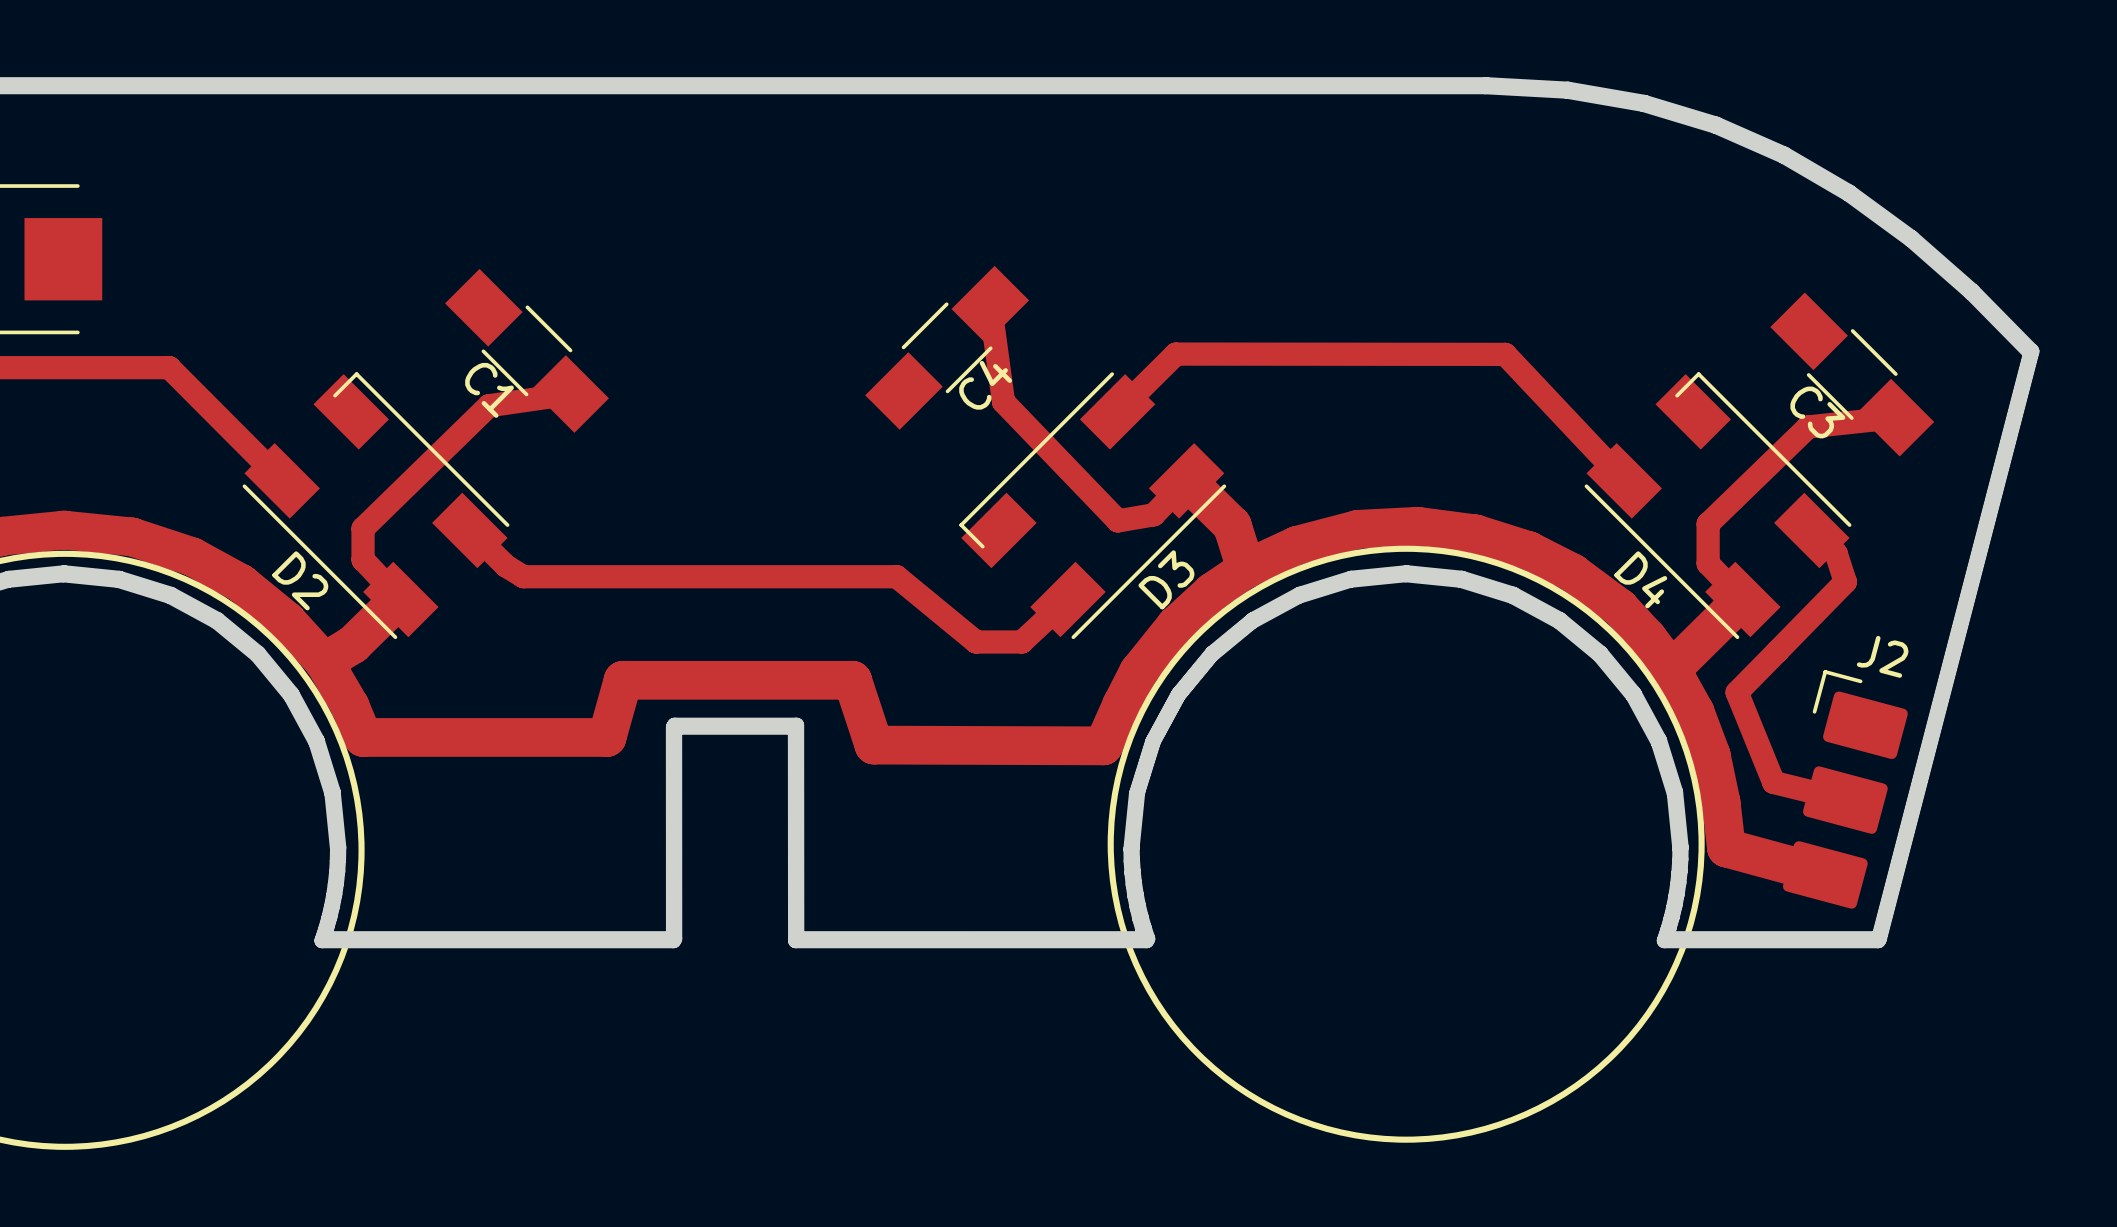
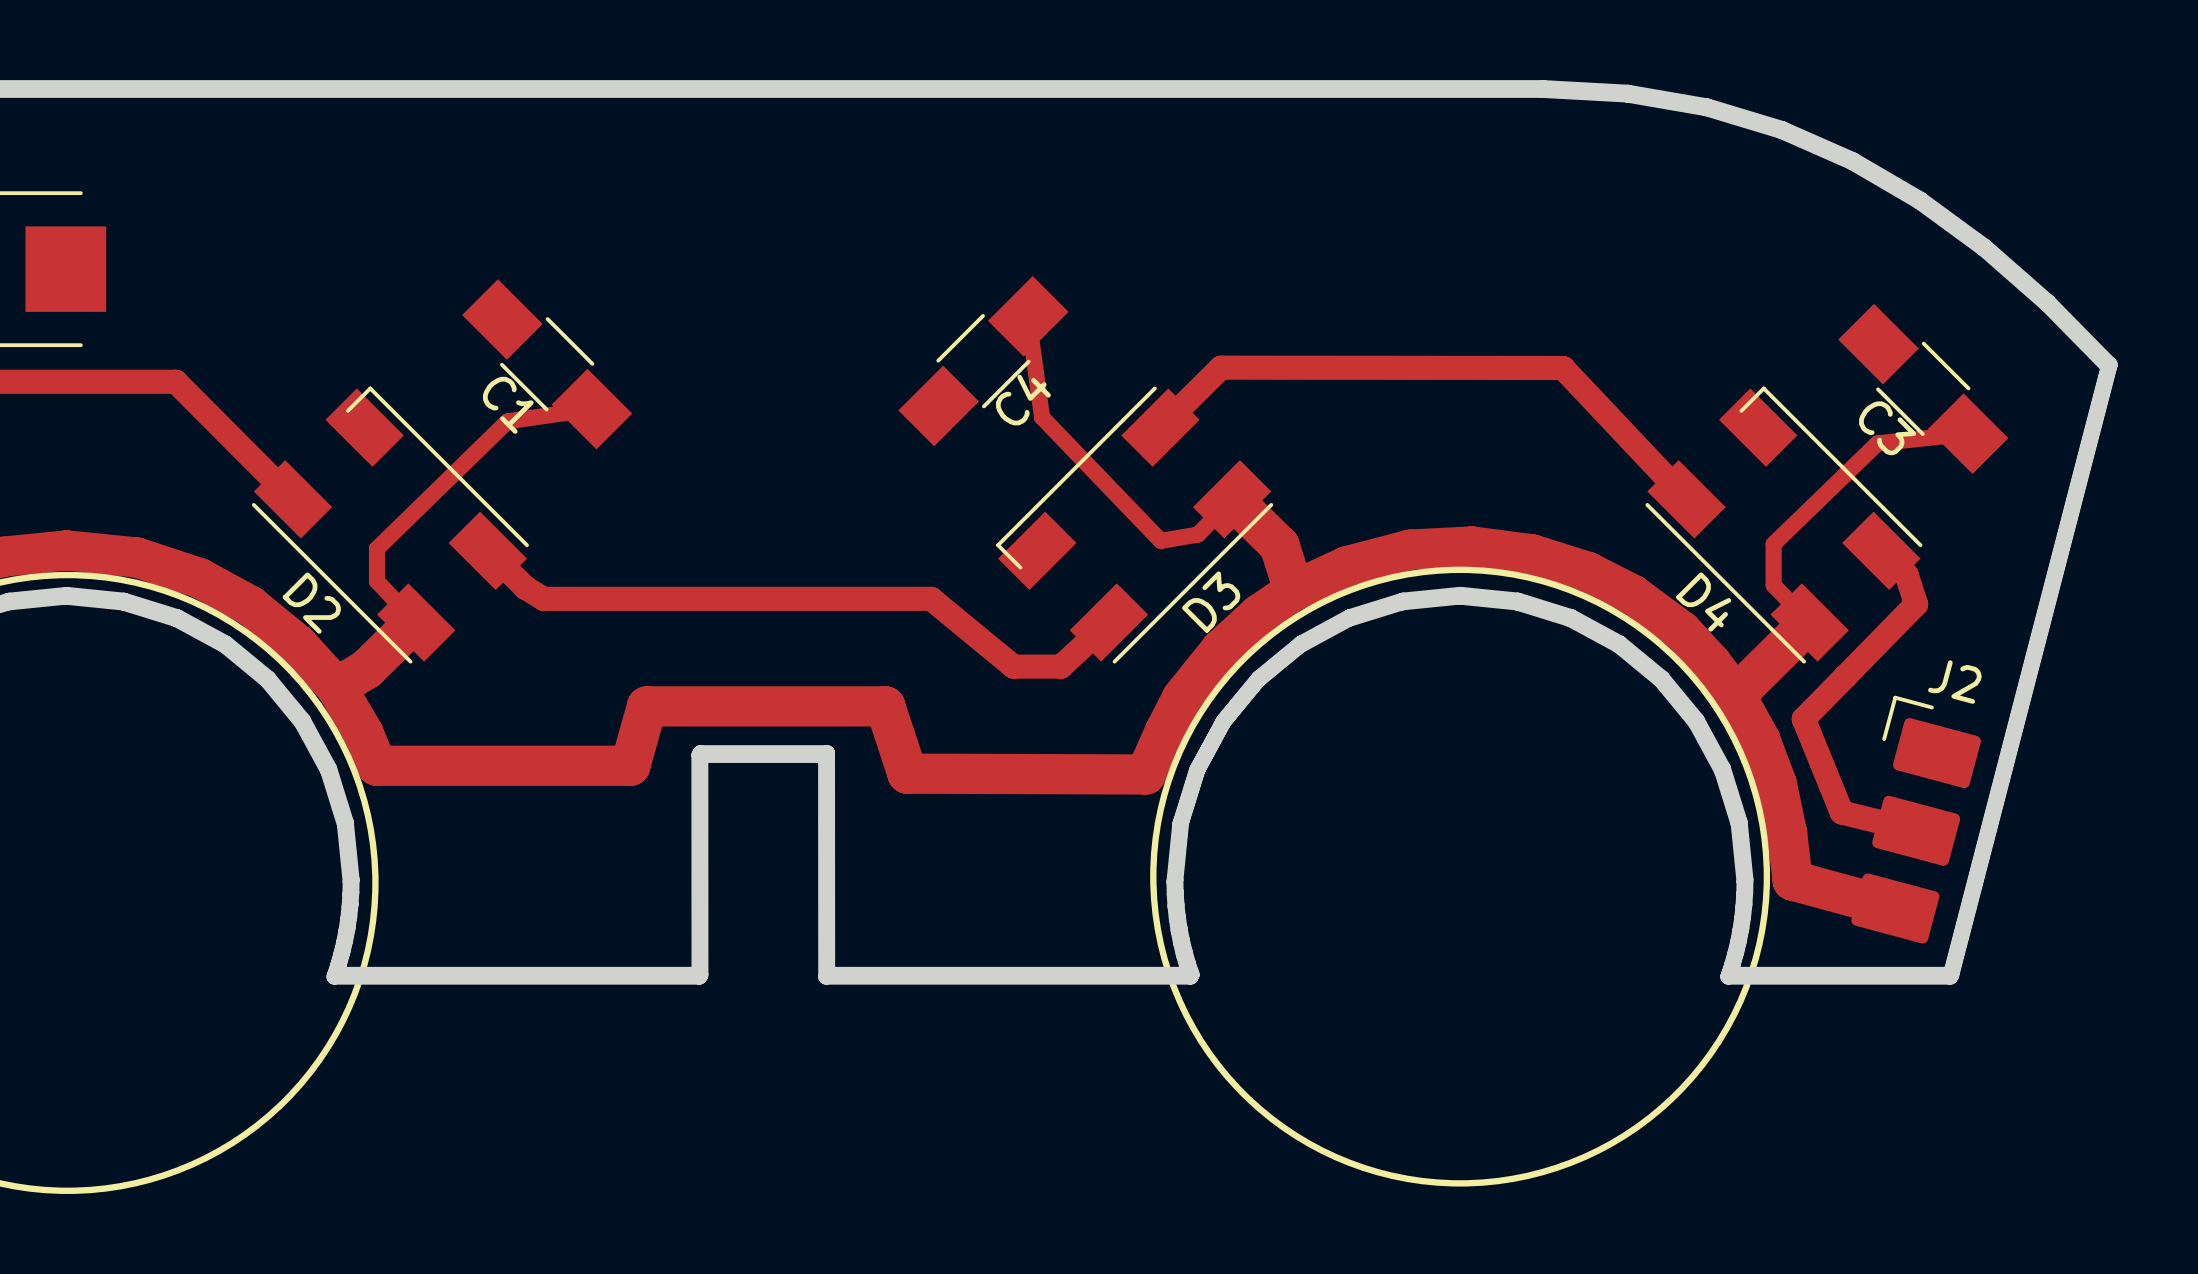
track width: thick (990, 304) (1003, 401) (1117, 520) (1153, 514) (1181, 486) -> thin (1028, 316) (1042, 417) (1160, 540) (1198, 534) (1226, 504)
track width: thick (570, 394) (488, 405) (363, 528) (363, 559) (395, 594) -> thin (591, 409) (507, 421) (376, 548) (376, 581) (410, 616)
track width: thick (1895, 417) (1808, 426) (1708, 523) (1708, 563) (1737, 594) -> thin (1968, 433) (1877, 443) (1773, 544) (1773, 585) (1804, 616)

